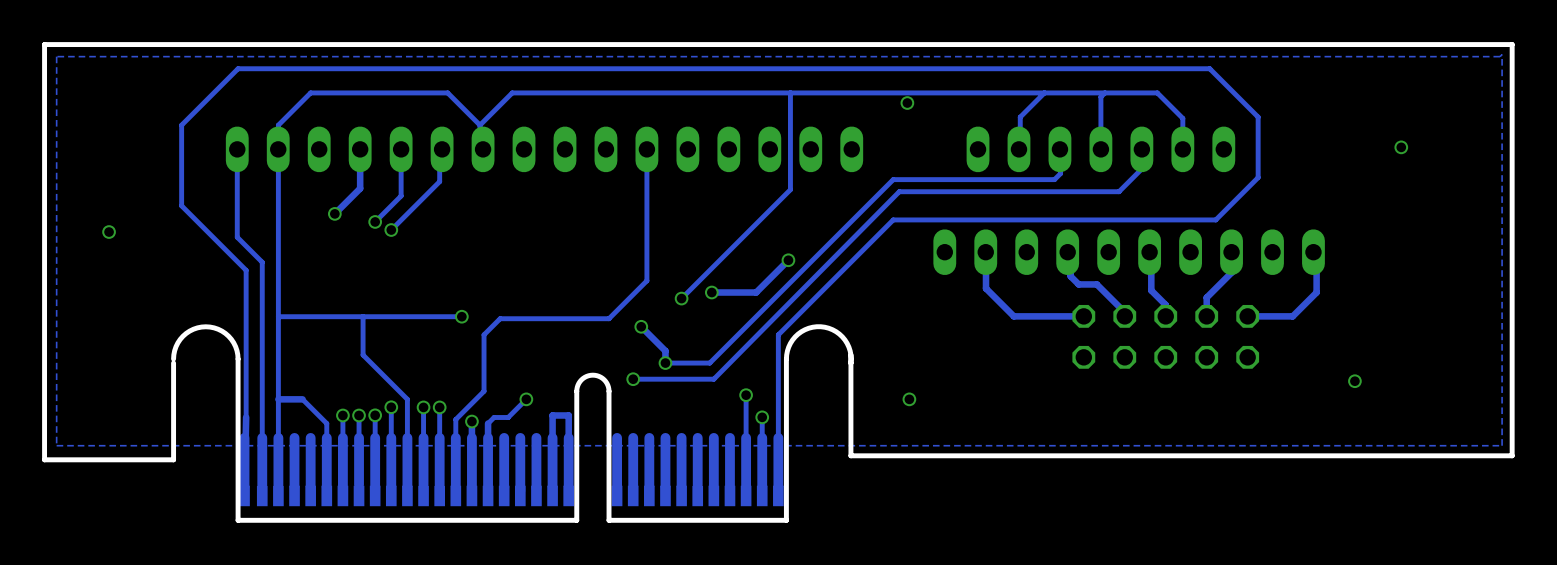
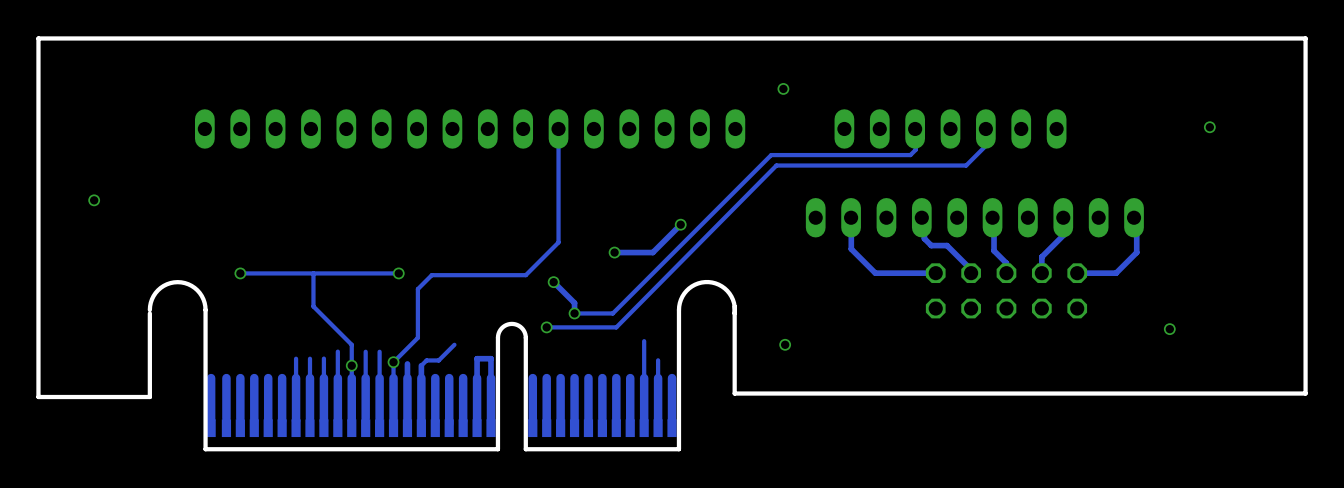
zone outline: (1502, 54) (1502, 445) (56, 445) (56, 56) (1500, 56) (1502, 54) -> none
track: (790, 92) (790, 189) (681, 298) -> none
track: (1044, 92) (1020, 117) (1020, 140) -> none
track: (1104, 92) (1100, 96) (1100, 149) -> none
track: (479, 125) (512, 92) (1157, 92) (1182, 118) (1182, 149) -> none
track: (479, 125) (447, 92) (310, 92) (278, 125) (278, 149) -> none
track: (237, 149) (237, 237) (262, 262) (262, 495) -> none
track: (278, 149) (278, 495) -> none
track: (360, 149) (360, 188) (334, 213) -> none
track: (401, 149) (401, 195) (375, 221) -> none
track: (442, 149) (439, 151) (439, 181) (391, 230) -> none
via: (334, 213) -> none
via: (375, 221) -> none
via: (391, 230) -> none
via: (681, 298) -> none
via: none -> (240, 273)
via: (746, 395) -> none
track: (278, 399) (302, 399) (326, 423) (326, 495) -> none
via: (526, 399) -> none
via: (391, 407) -> none
via: (423, 407) -> none
via: (439, 407) -> none
via: (342, 415) -> none
via: (359, 415) -> none
via: (375, 415) -> none
via: (762, 417) -> none
via: none -> (393, 362)
via: (471, 421) -> none
via: none -> (351, 365)
track: (244, 495) (246, 270) (181, 205) (181, 125) (238, 68) (1209, 68) (1258, 117) (1258, 177) (1215, 219) (893, 219) (778, 334) (778, 496) -> none

